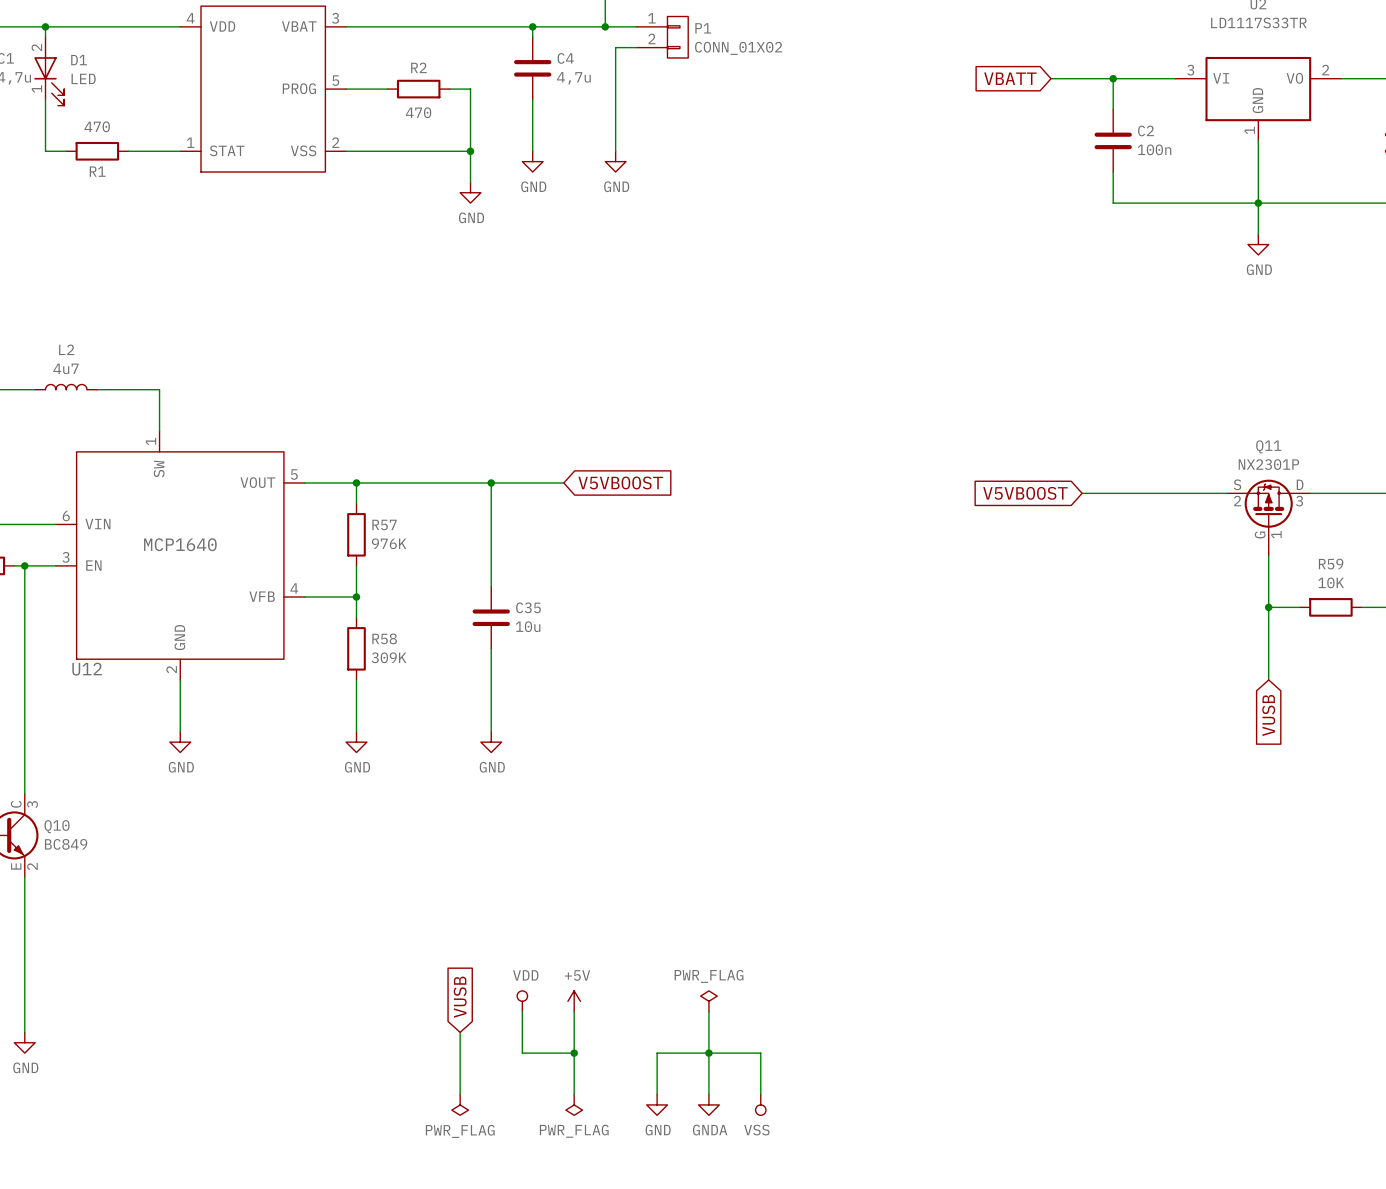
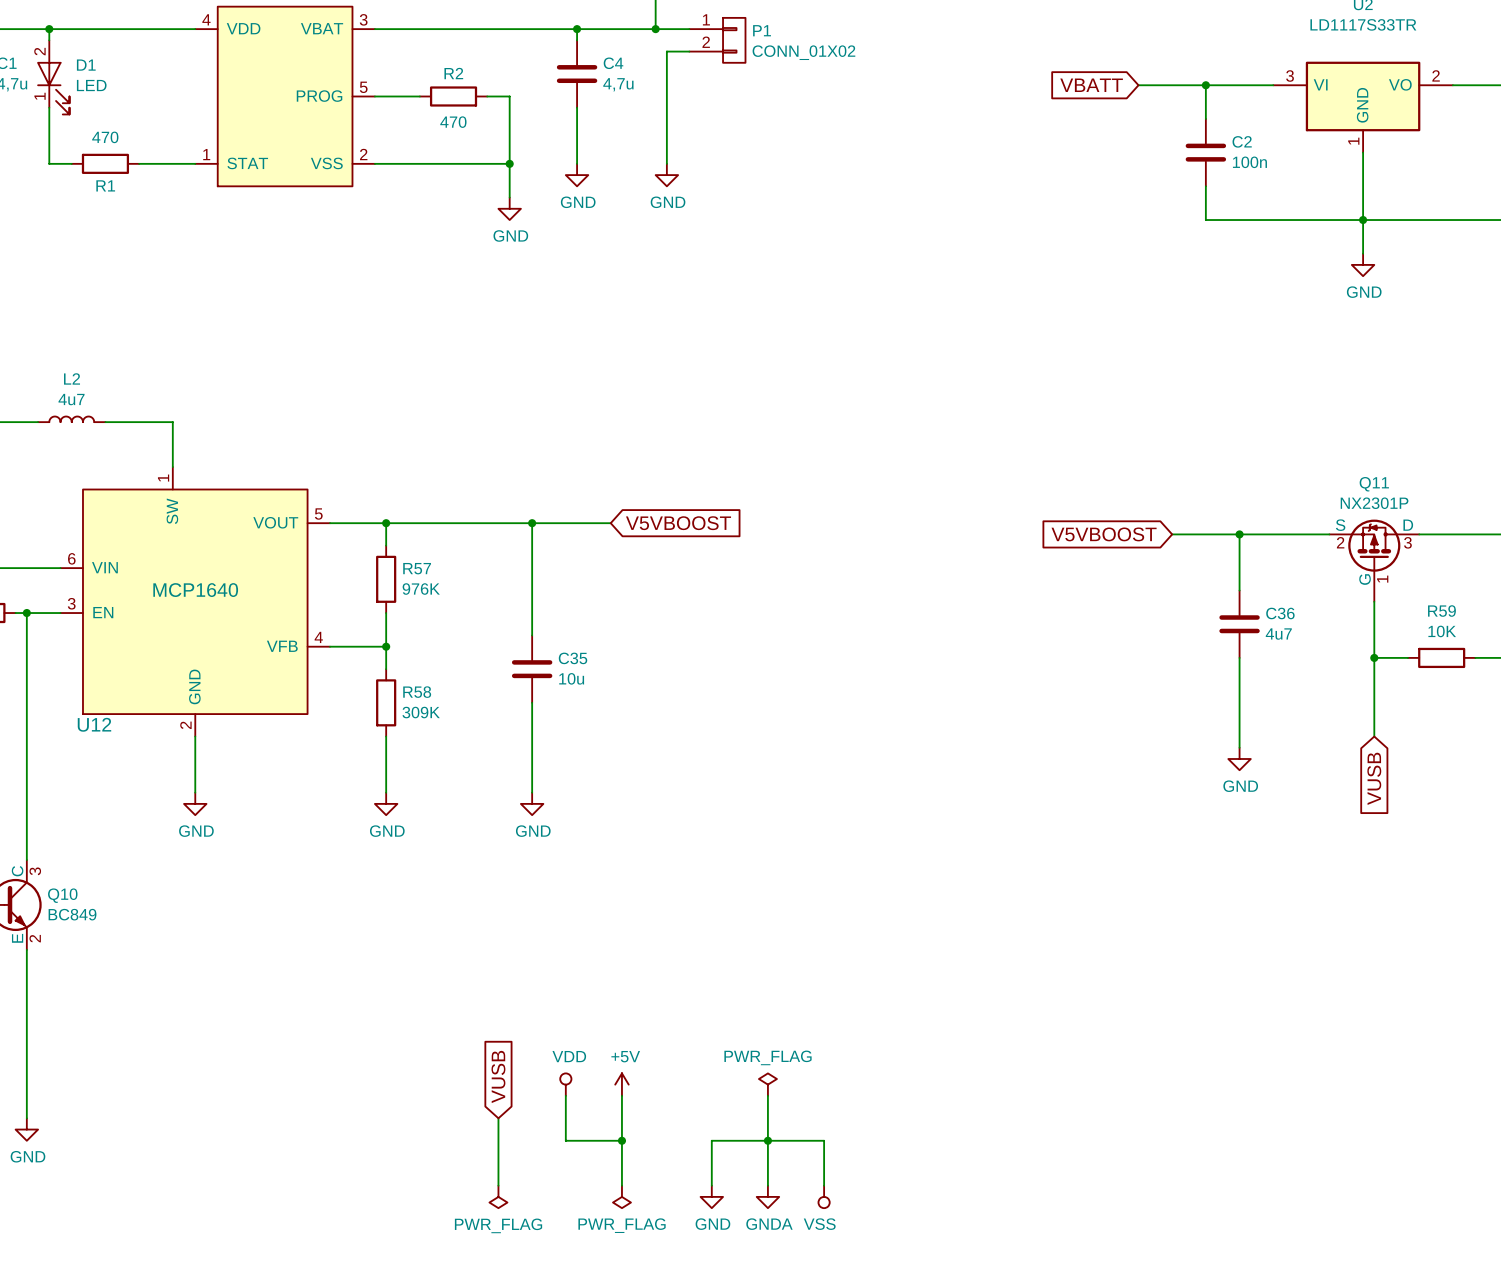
wire: none -> (1239, 534) (1239, 590)
junction: none -> (1239, 534)
C36: none -> 4u7 (1239, 624)
wire: none -> (1239, 657) (1239, 747)
power symbol: none -> GND (1239, 758)

